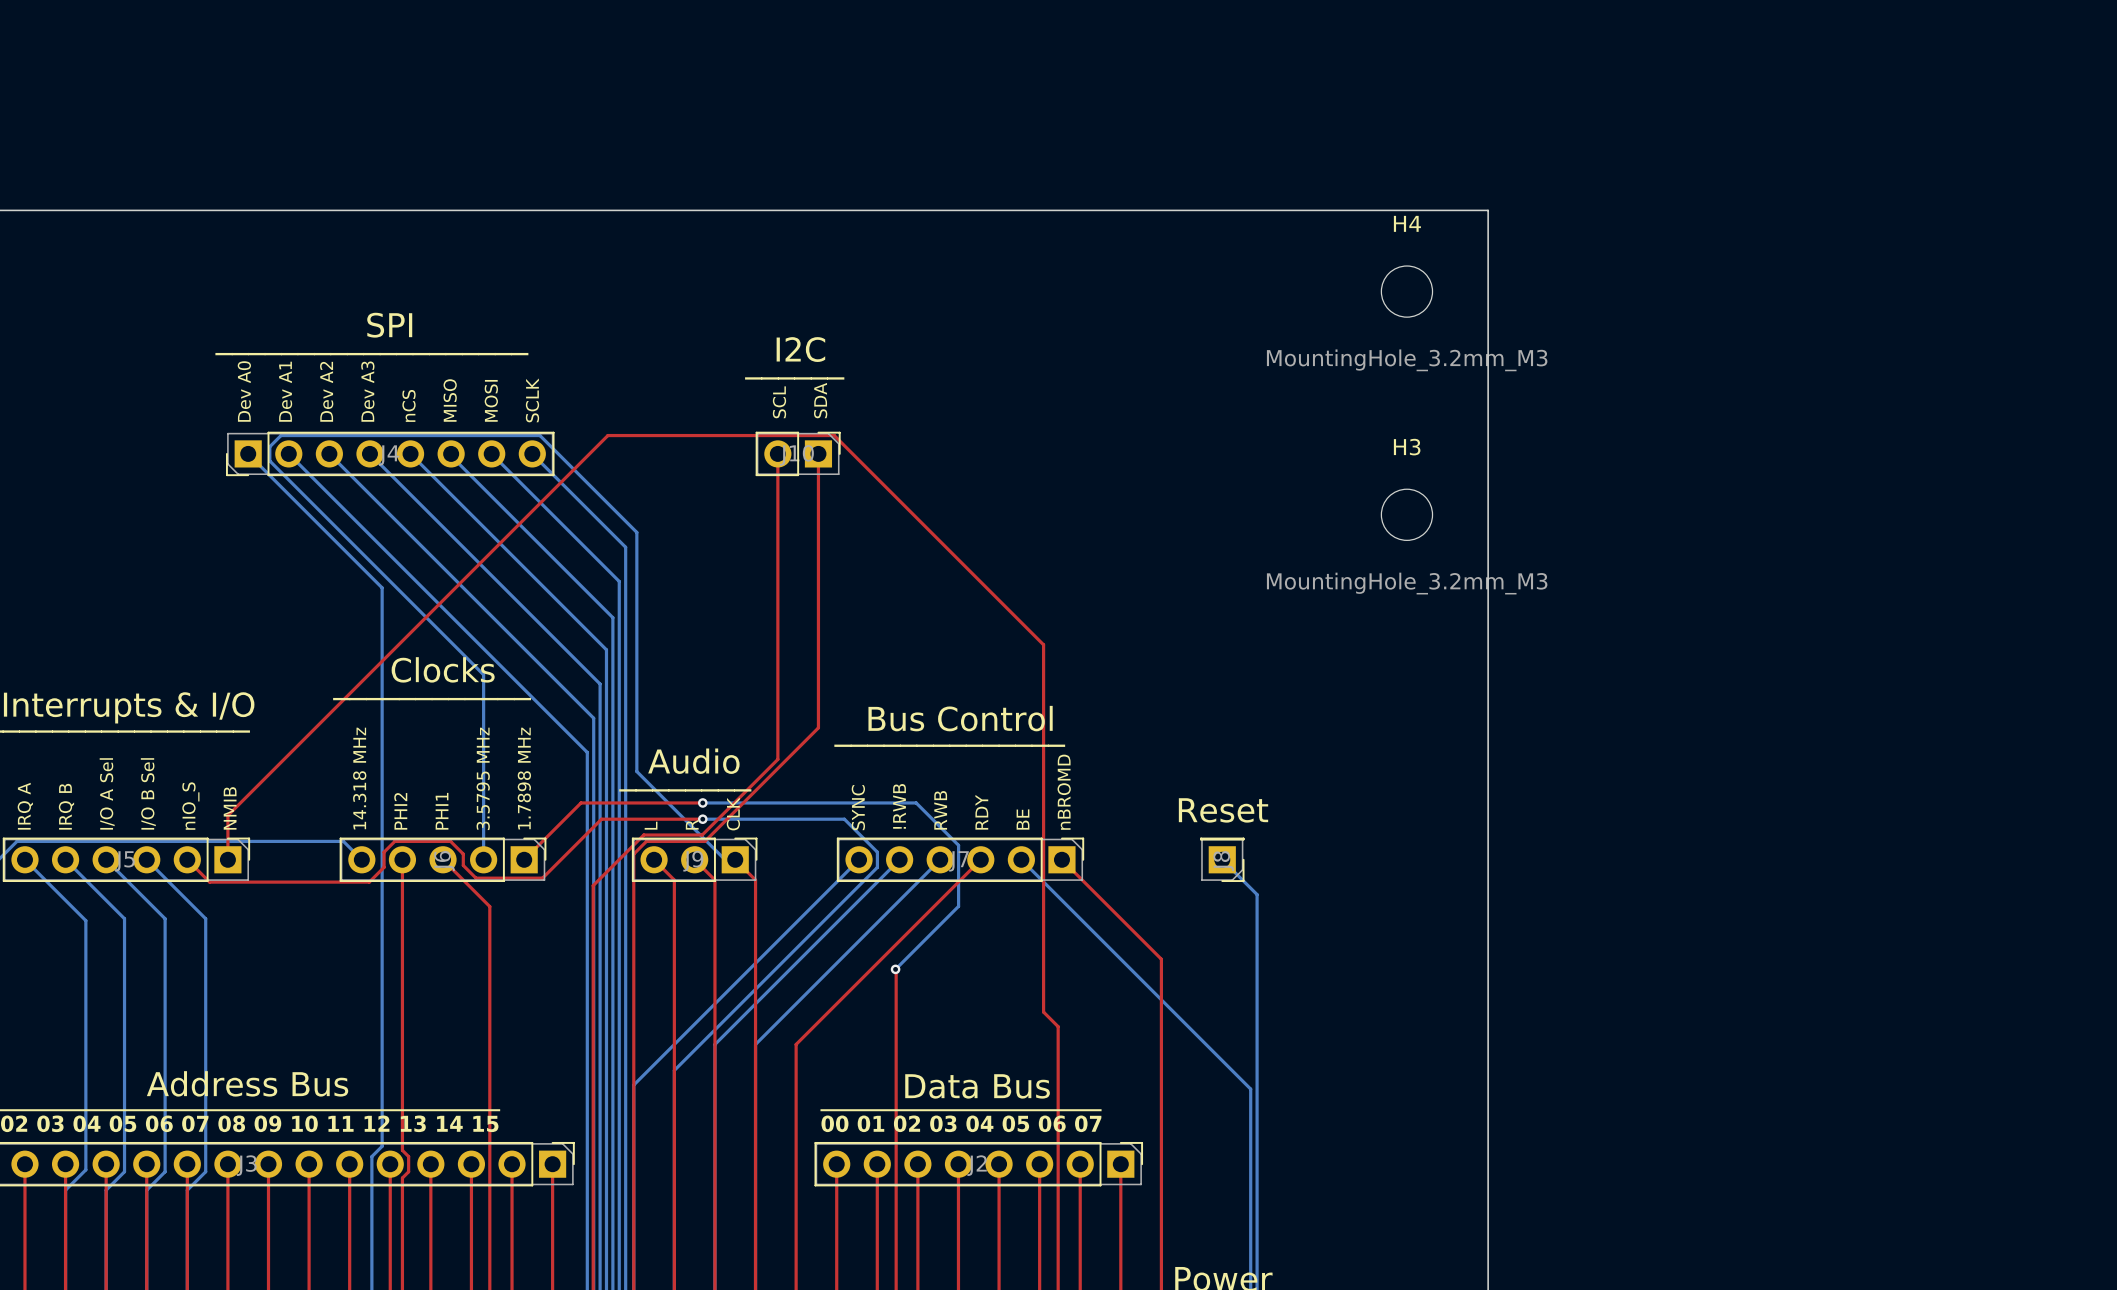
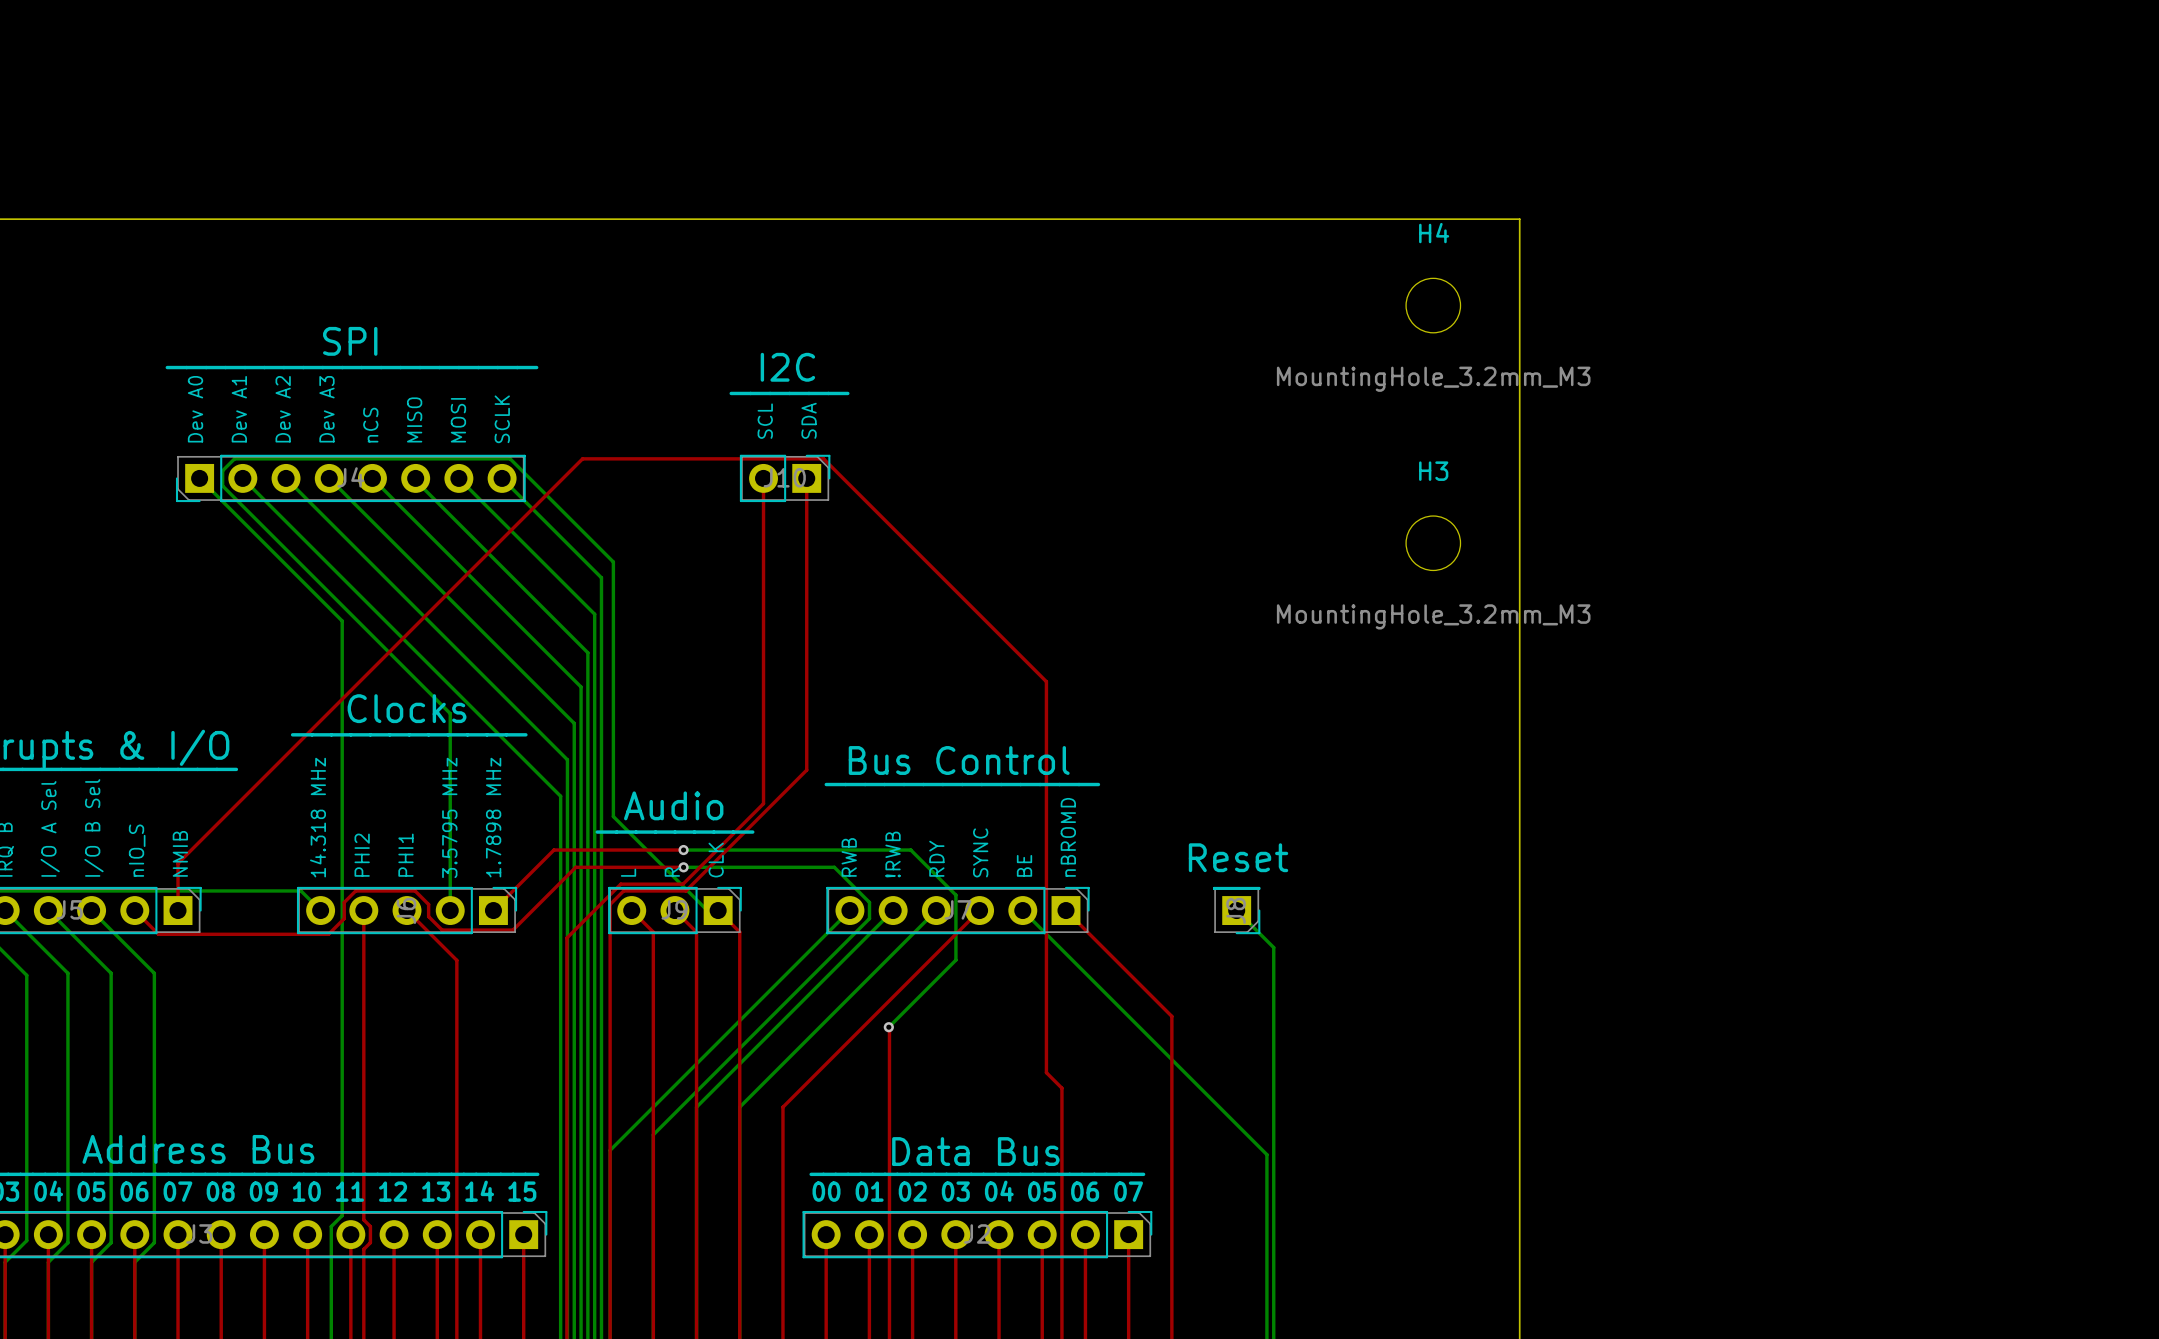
text: SYNC (858, 807) -> RWB (849, 857)
text: RWB (940, 810) -> RDY (936, 858)
text: RDY (981, 812) -> SYNC (980, 852)

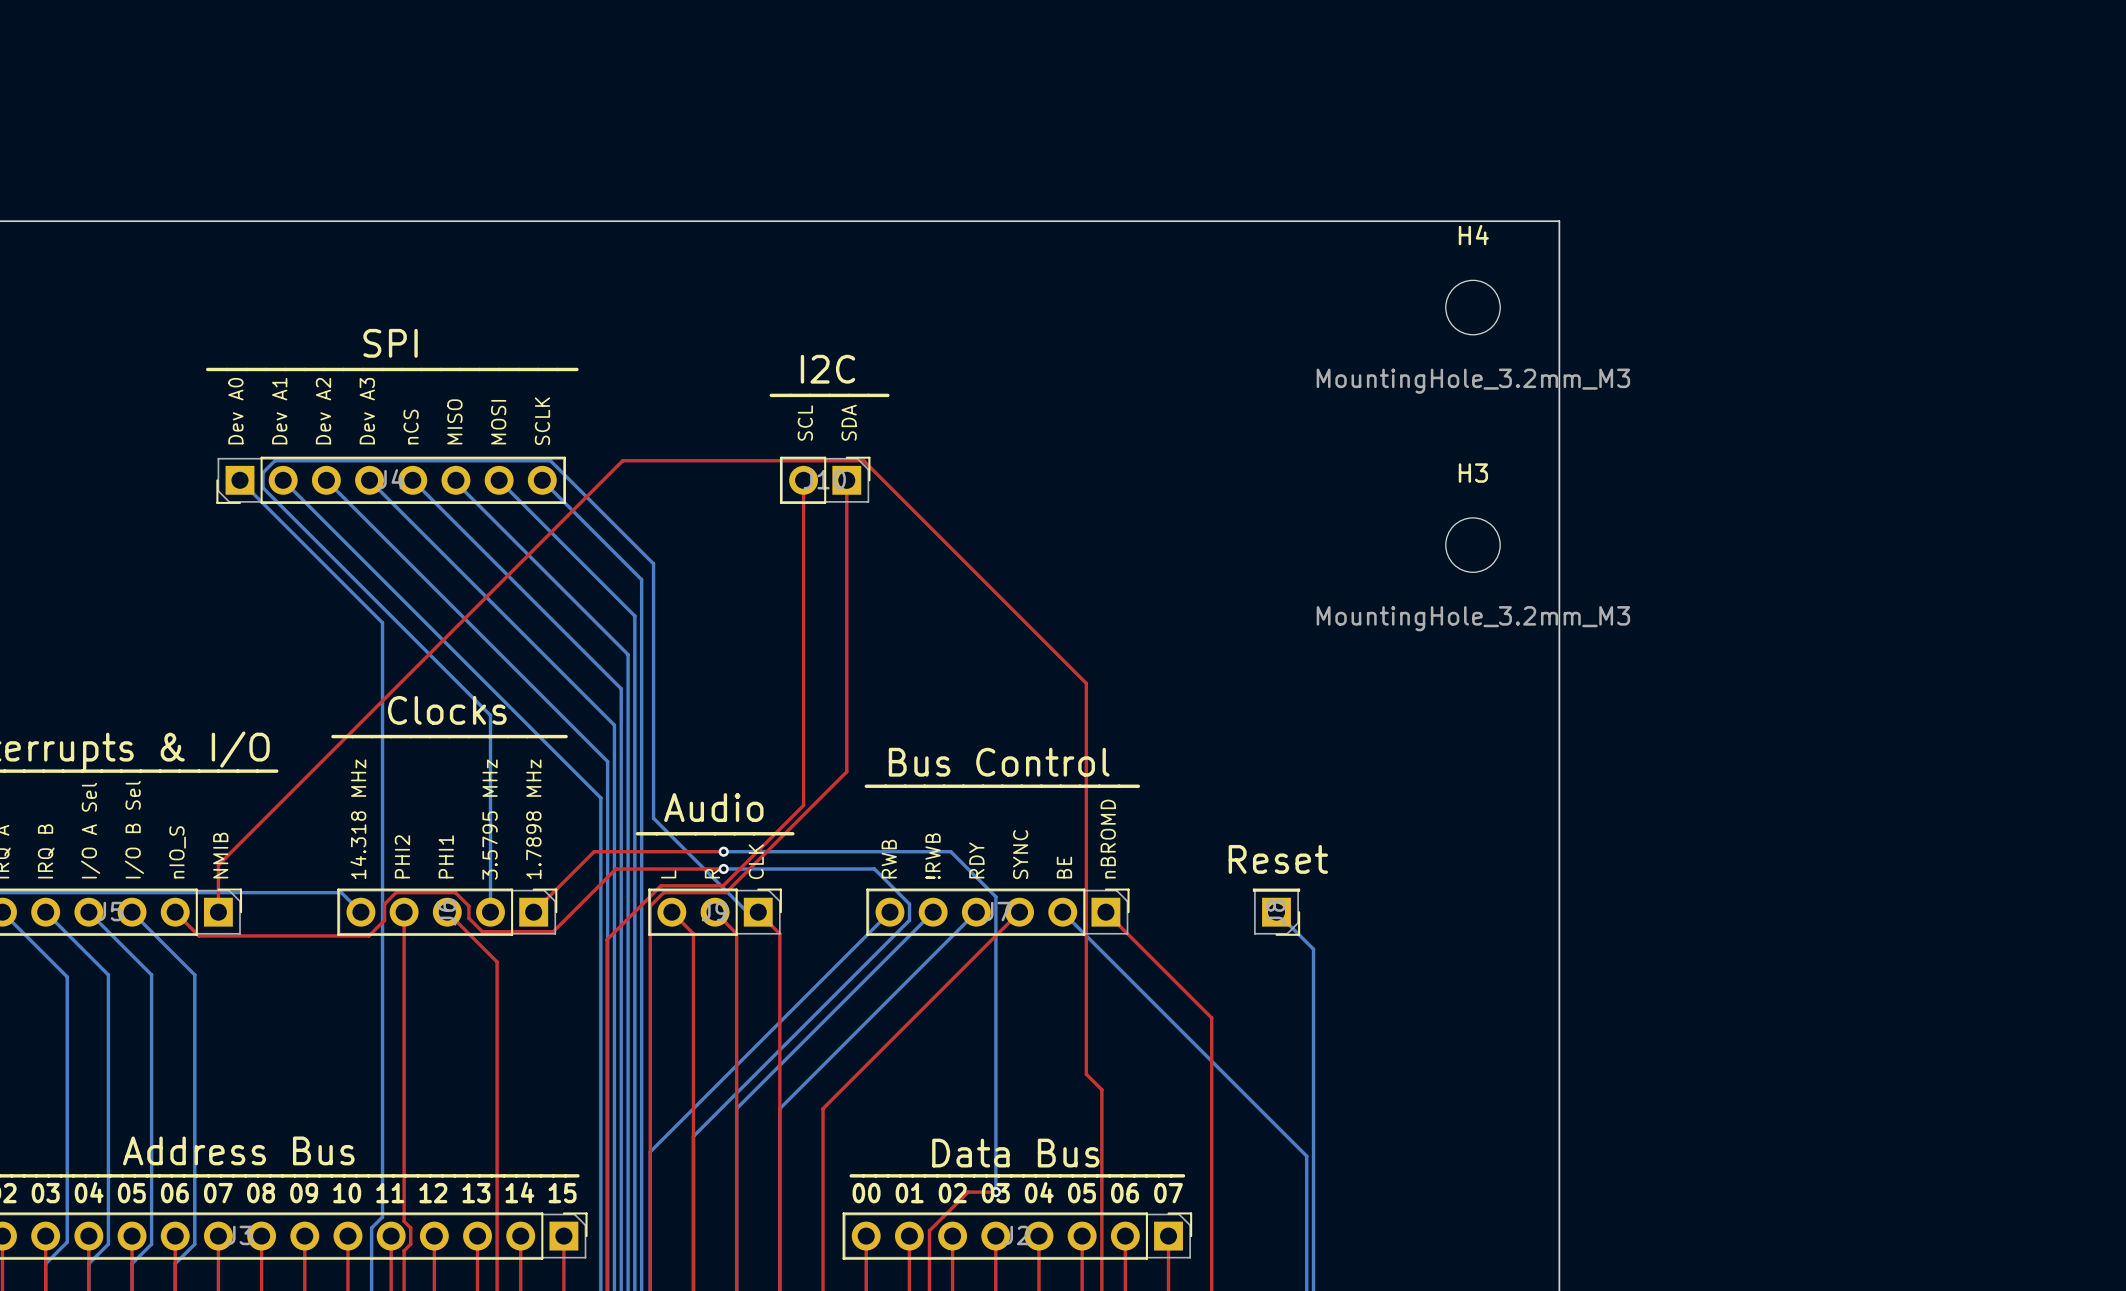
bottom track: (955, 960) (888, 1027) -> (995, 961) (995, 1192)
top track: (888, 1027) (889, 1229) -> (995, 1192) (968, 1192) (929, 1230)
via: (888, 1027) -> none
via: none -> (995, 1192)

